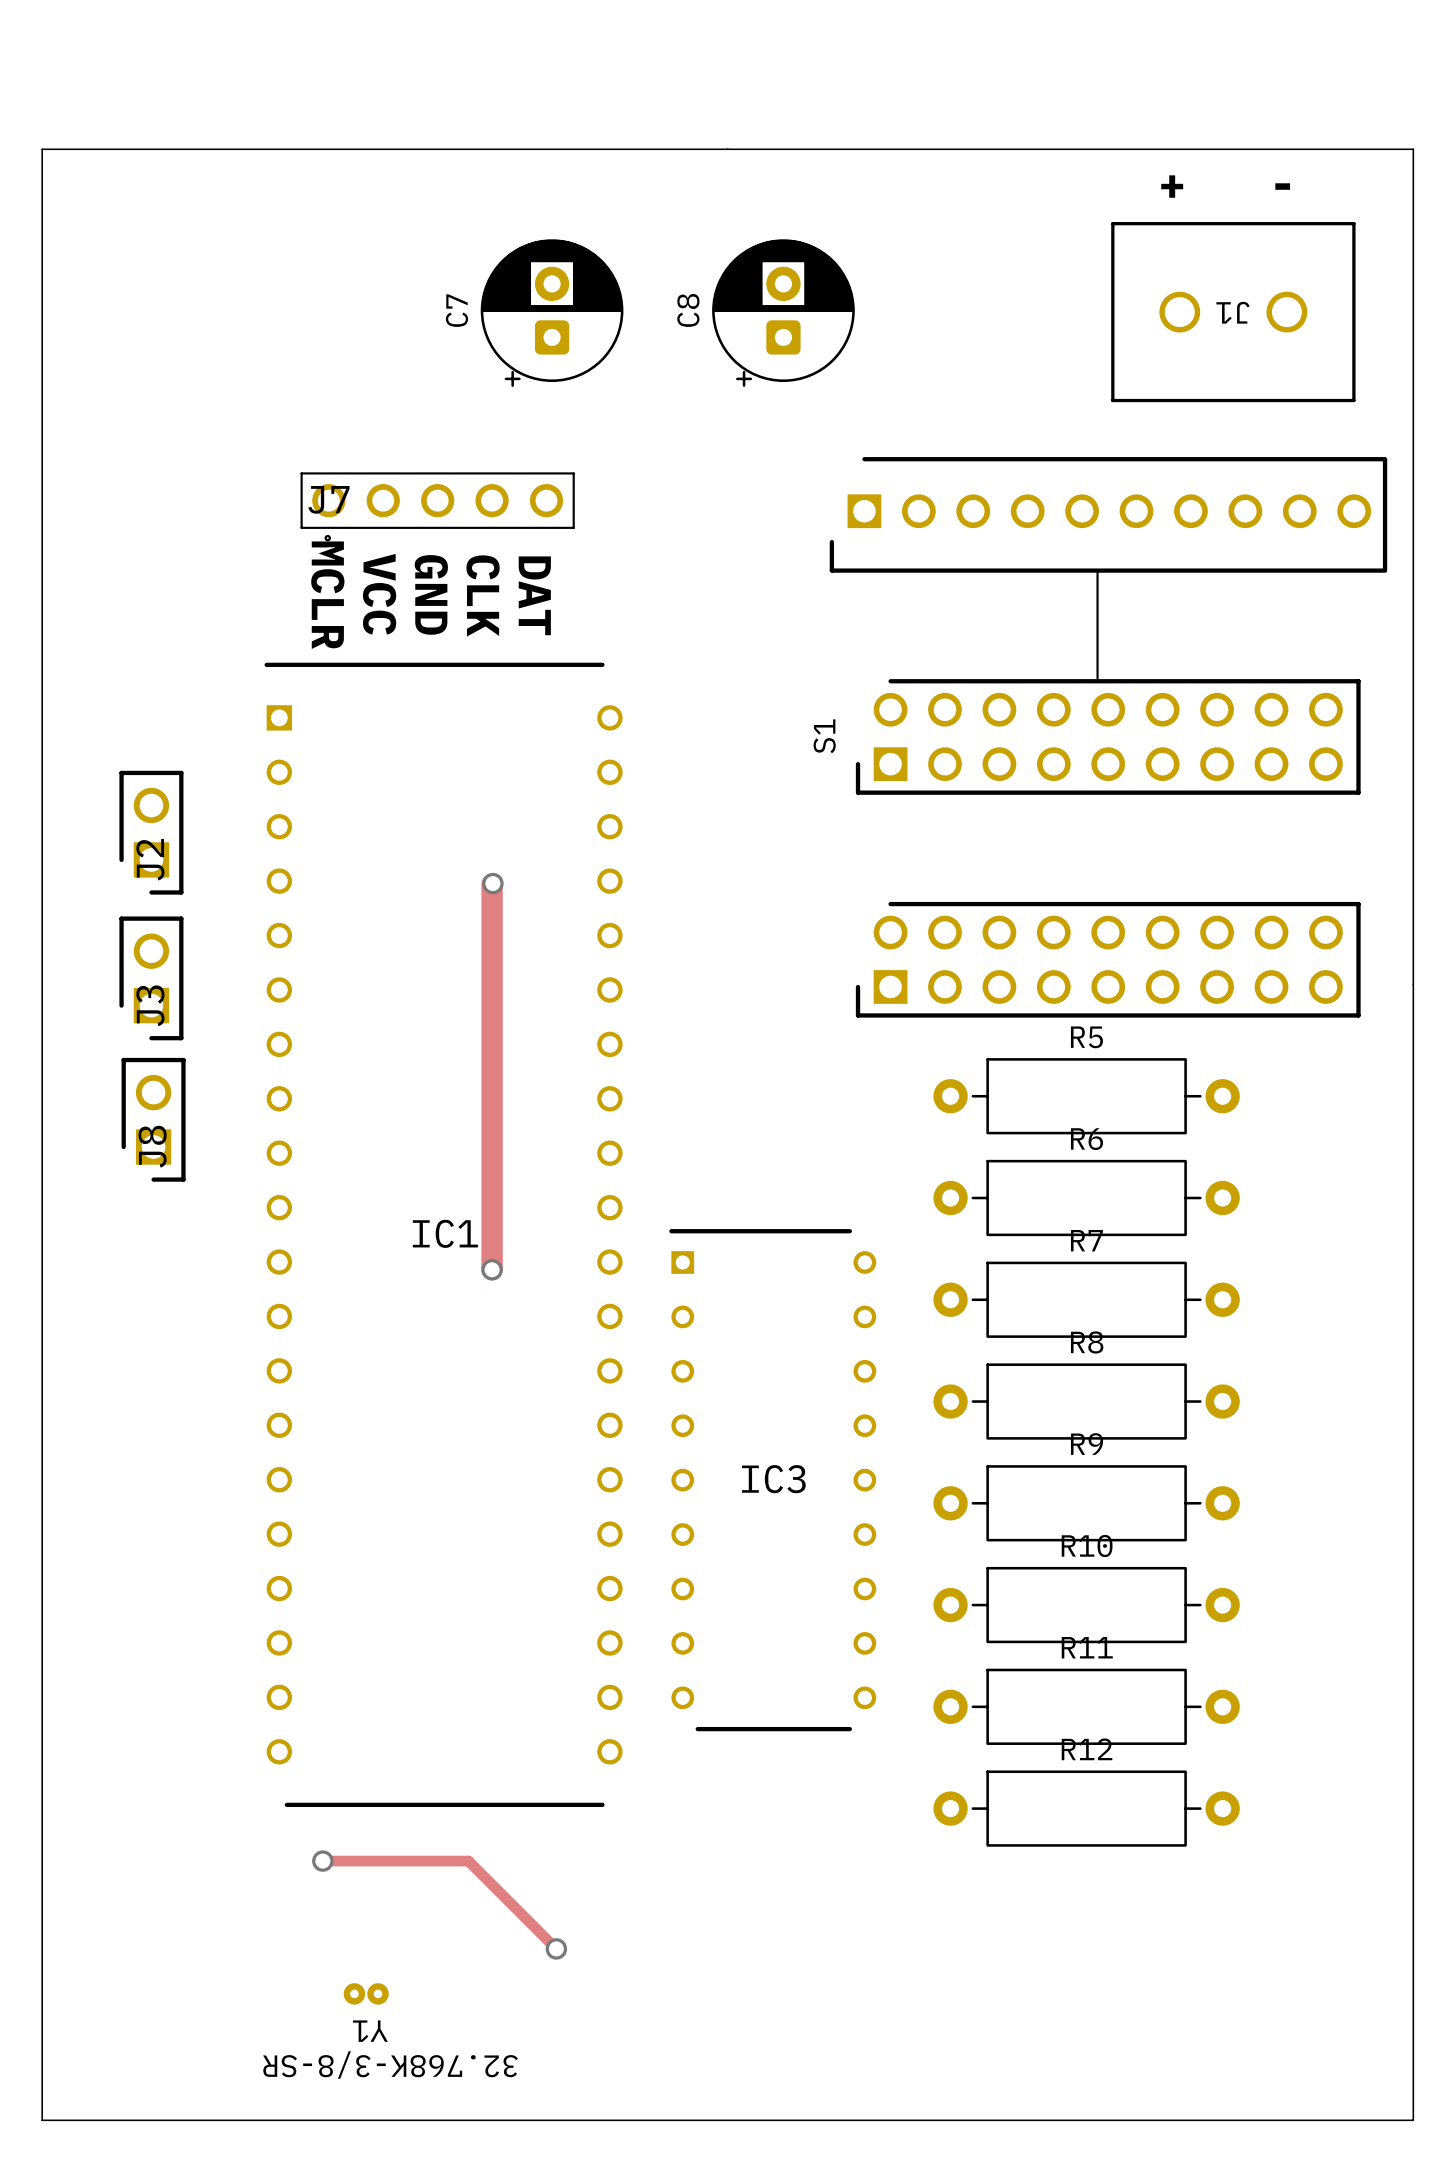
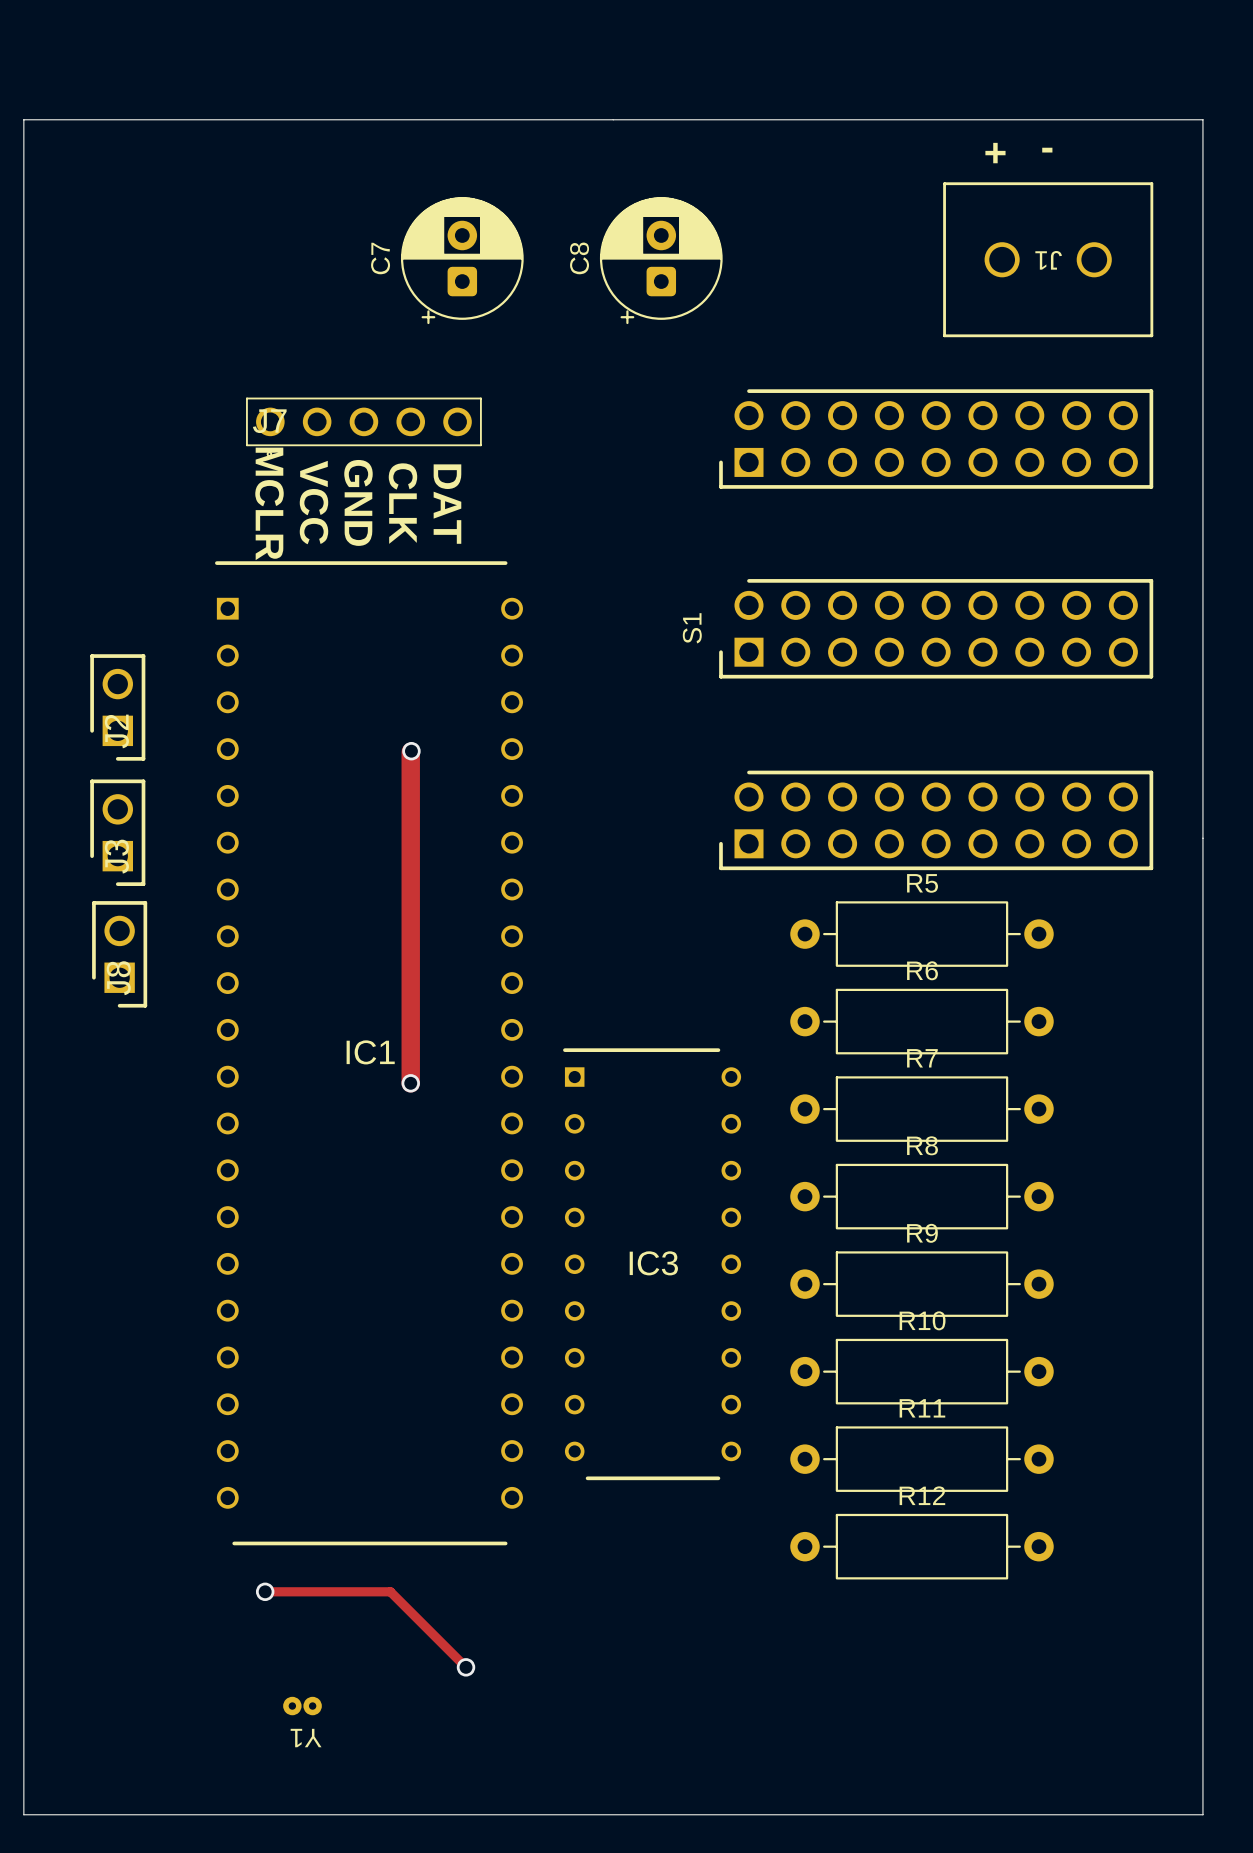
S1 footprint: [829, 457, 1388, 1018] -> [719, 389, 1154, 871]
Y1 text: 32.768K-3/8-SR (390, 2065) -> none

